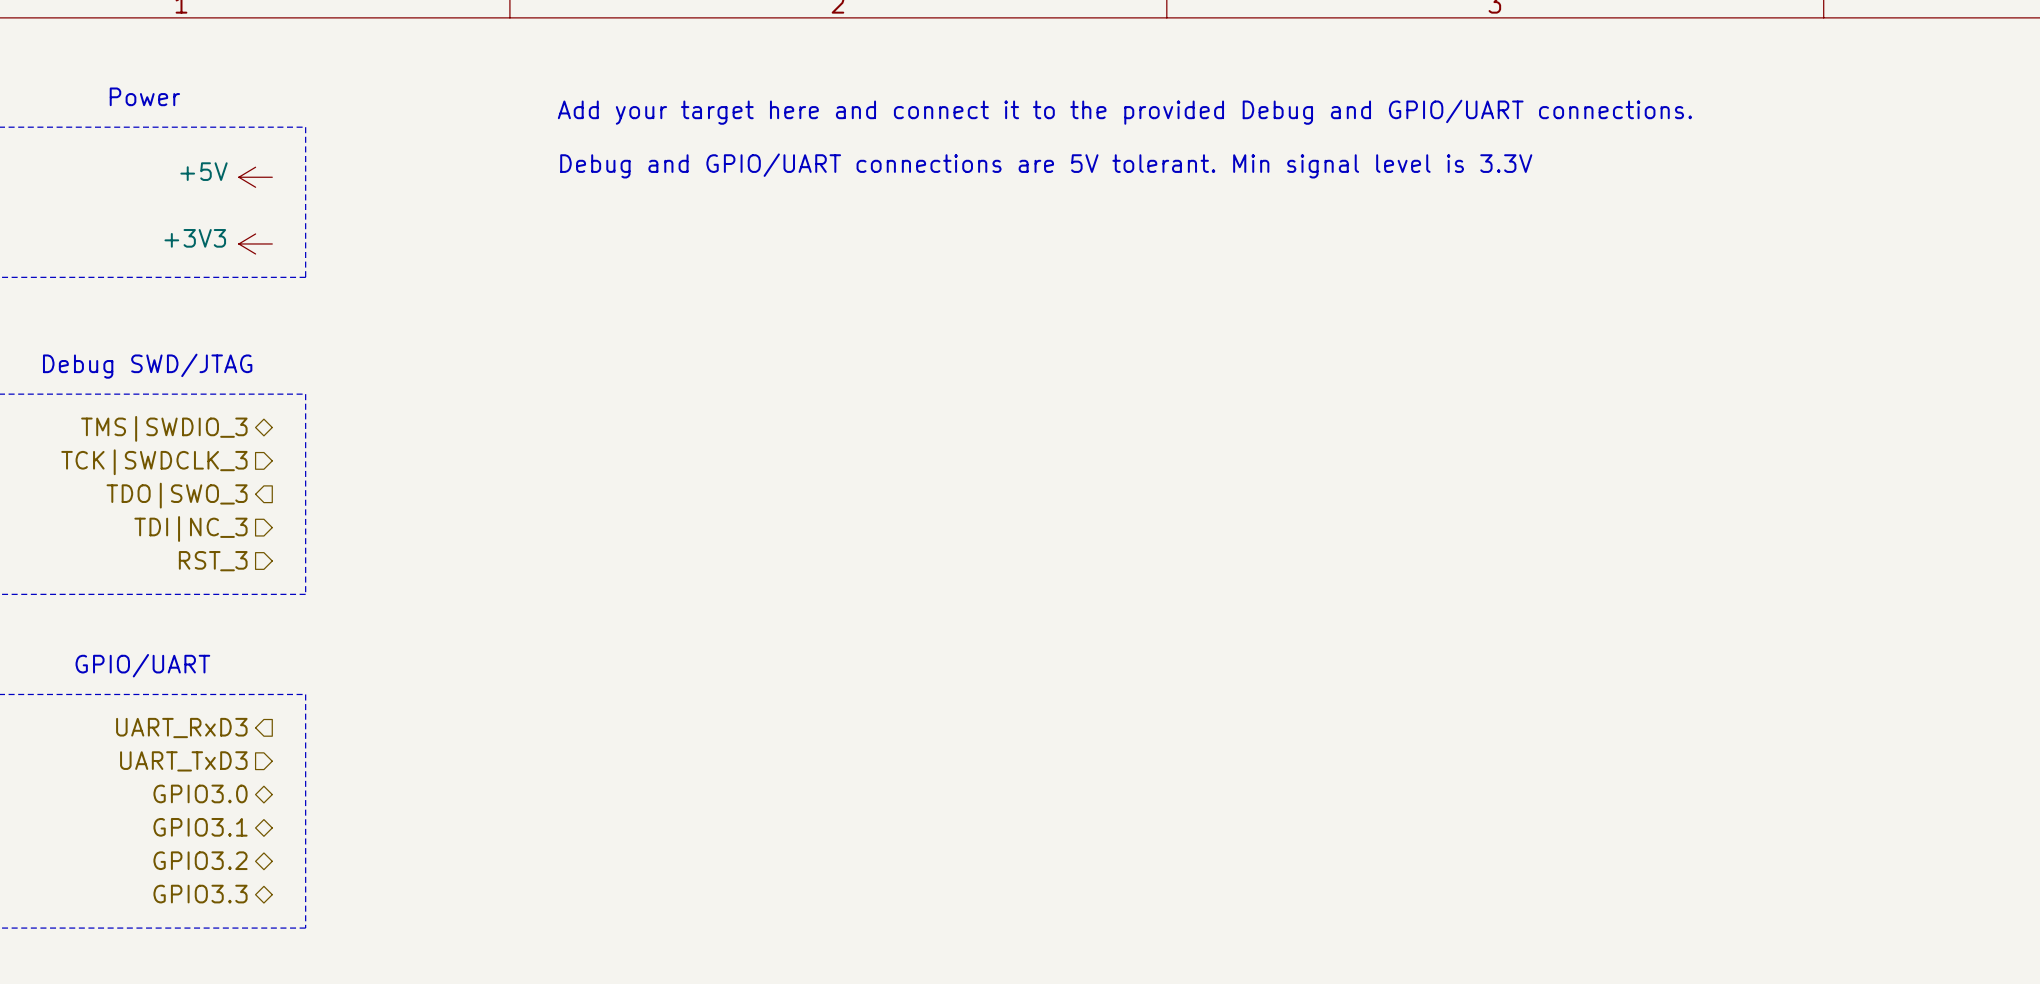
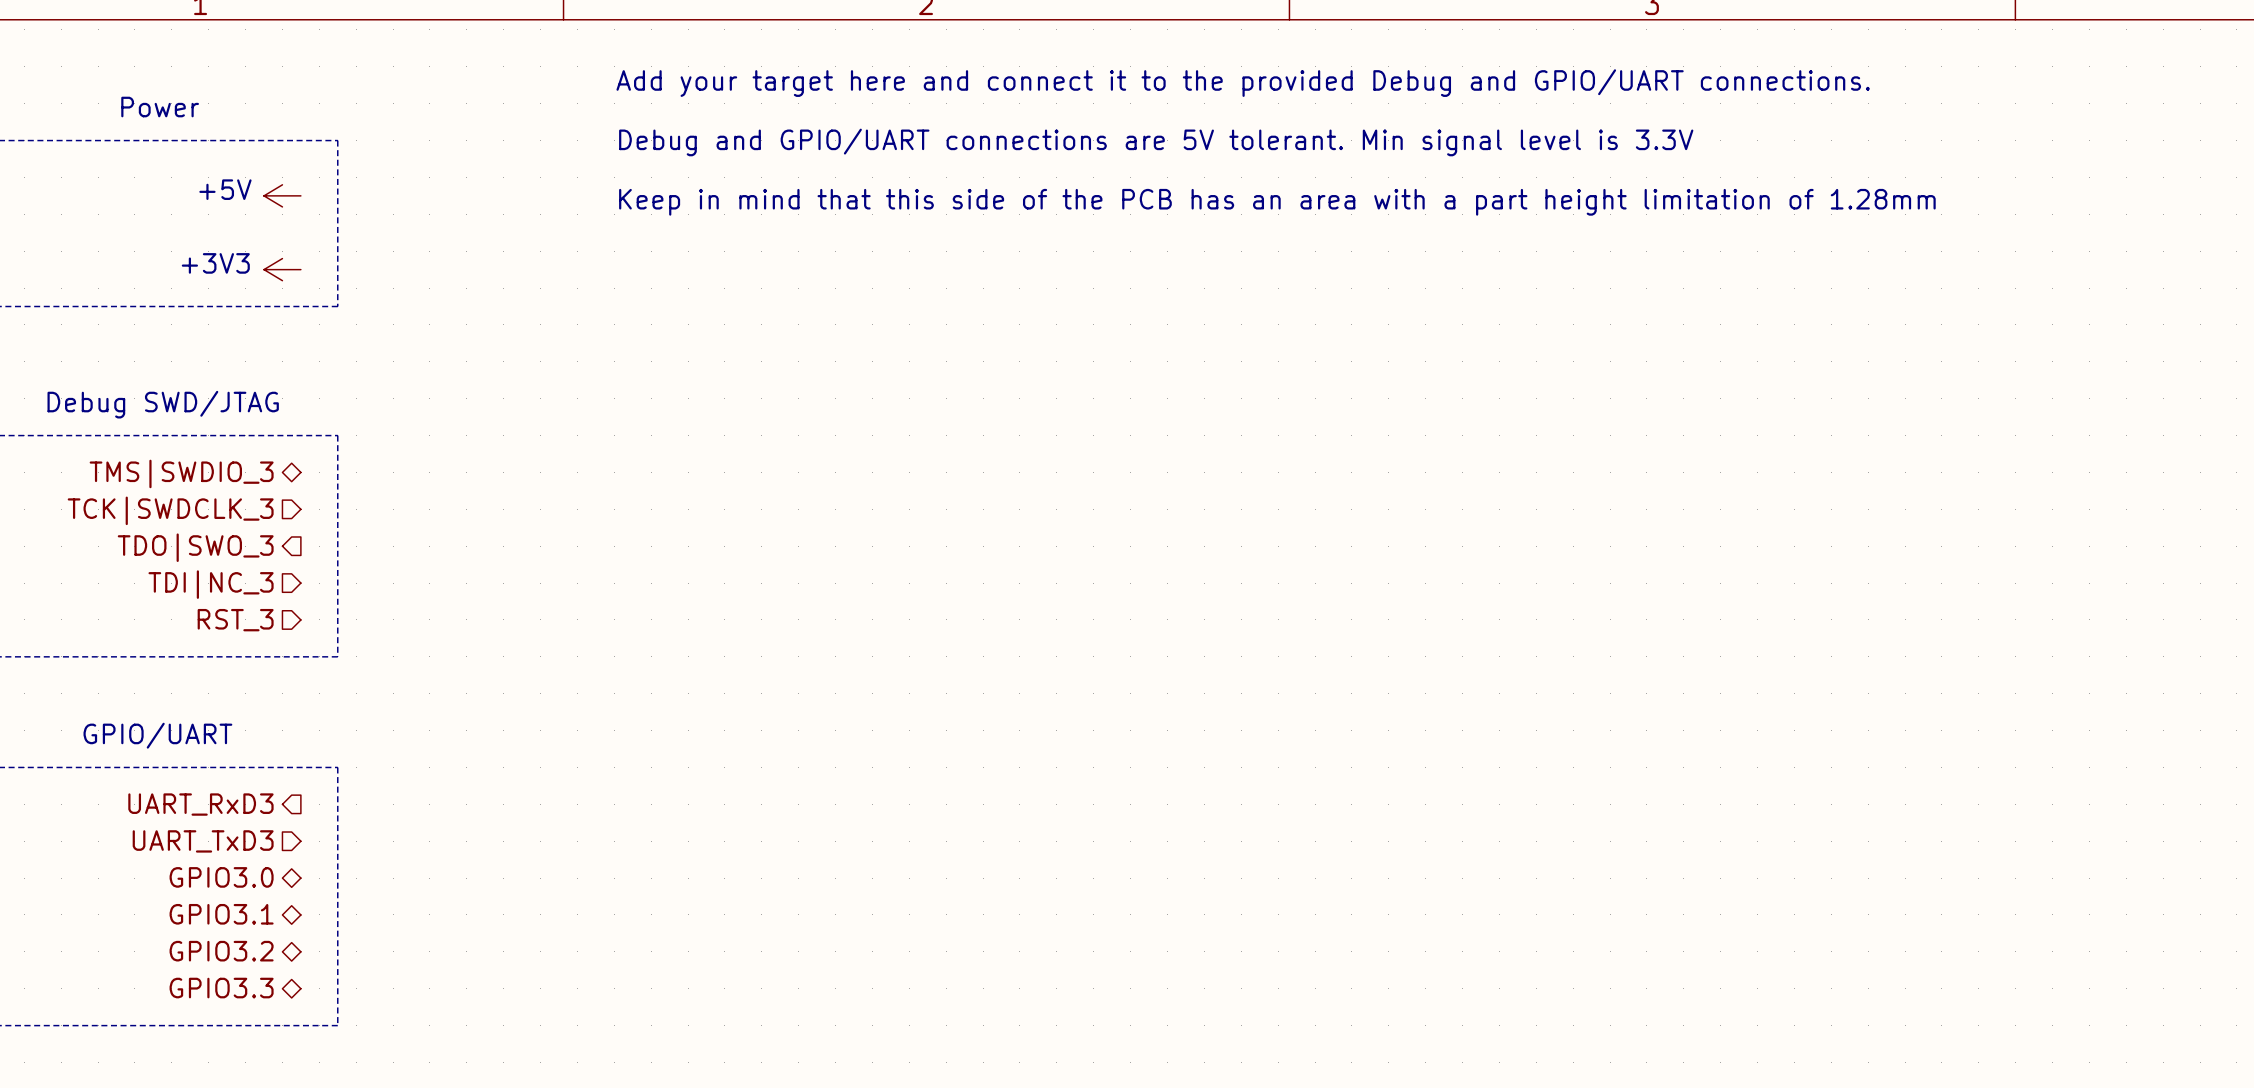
text position: Add your target here and connect it to the provided Debug and GPIO/UART connections. (1124, 112) -> Add your target here and connect it to the provided Debug and GPIO/UART connections. (1243, 83)
text position: Debug and GPIO/UART connections are 5V tolerant. Min signal level is 3.3V (1046, 165) -> Debug and GPIO/UART connections are 5V tolerant. Min signal level is 3.3V (1156, 142)
text: none -> Keep in mind that this side of the PCB has an area with a part height limitation of 1.28mm (1277, 202)

